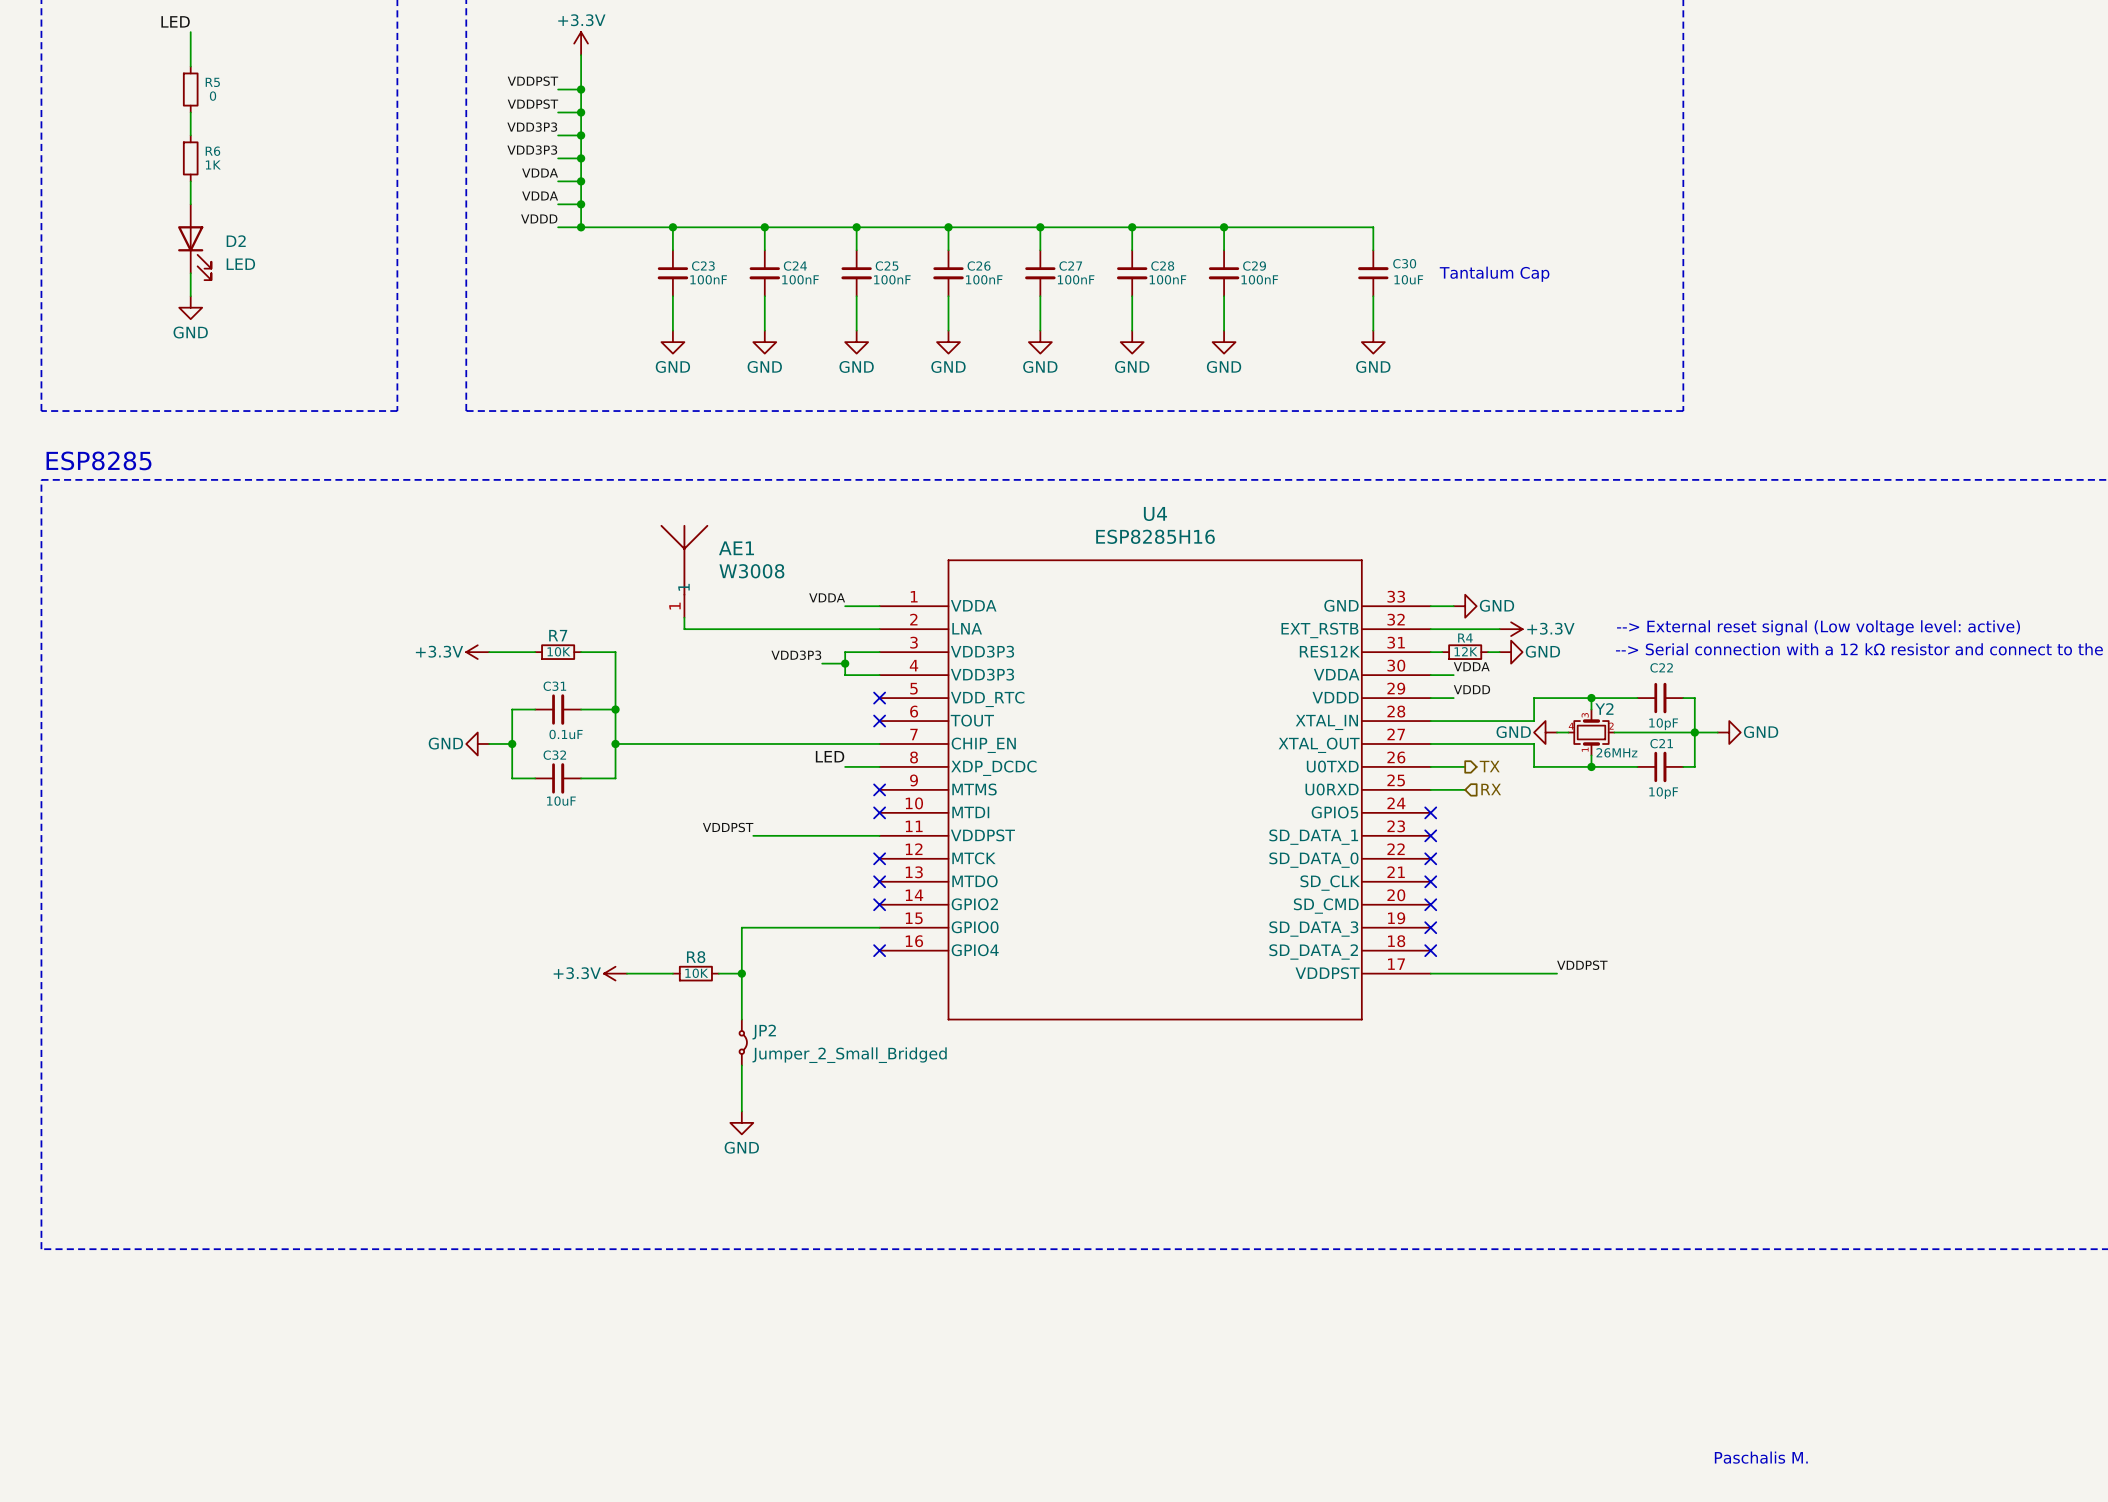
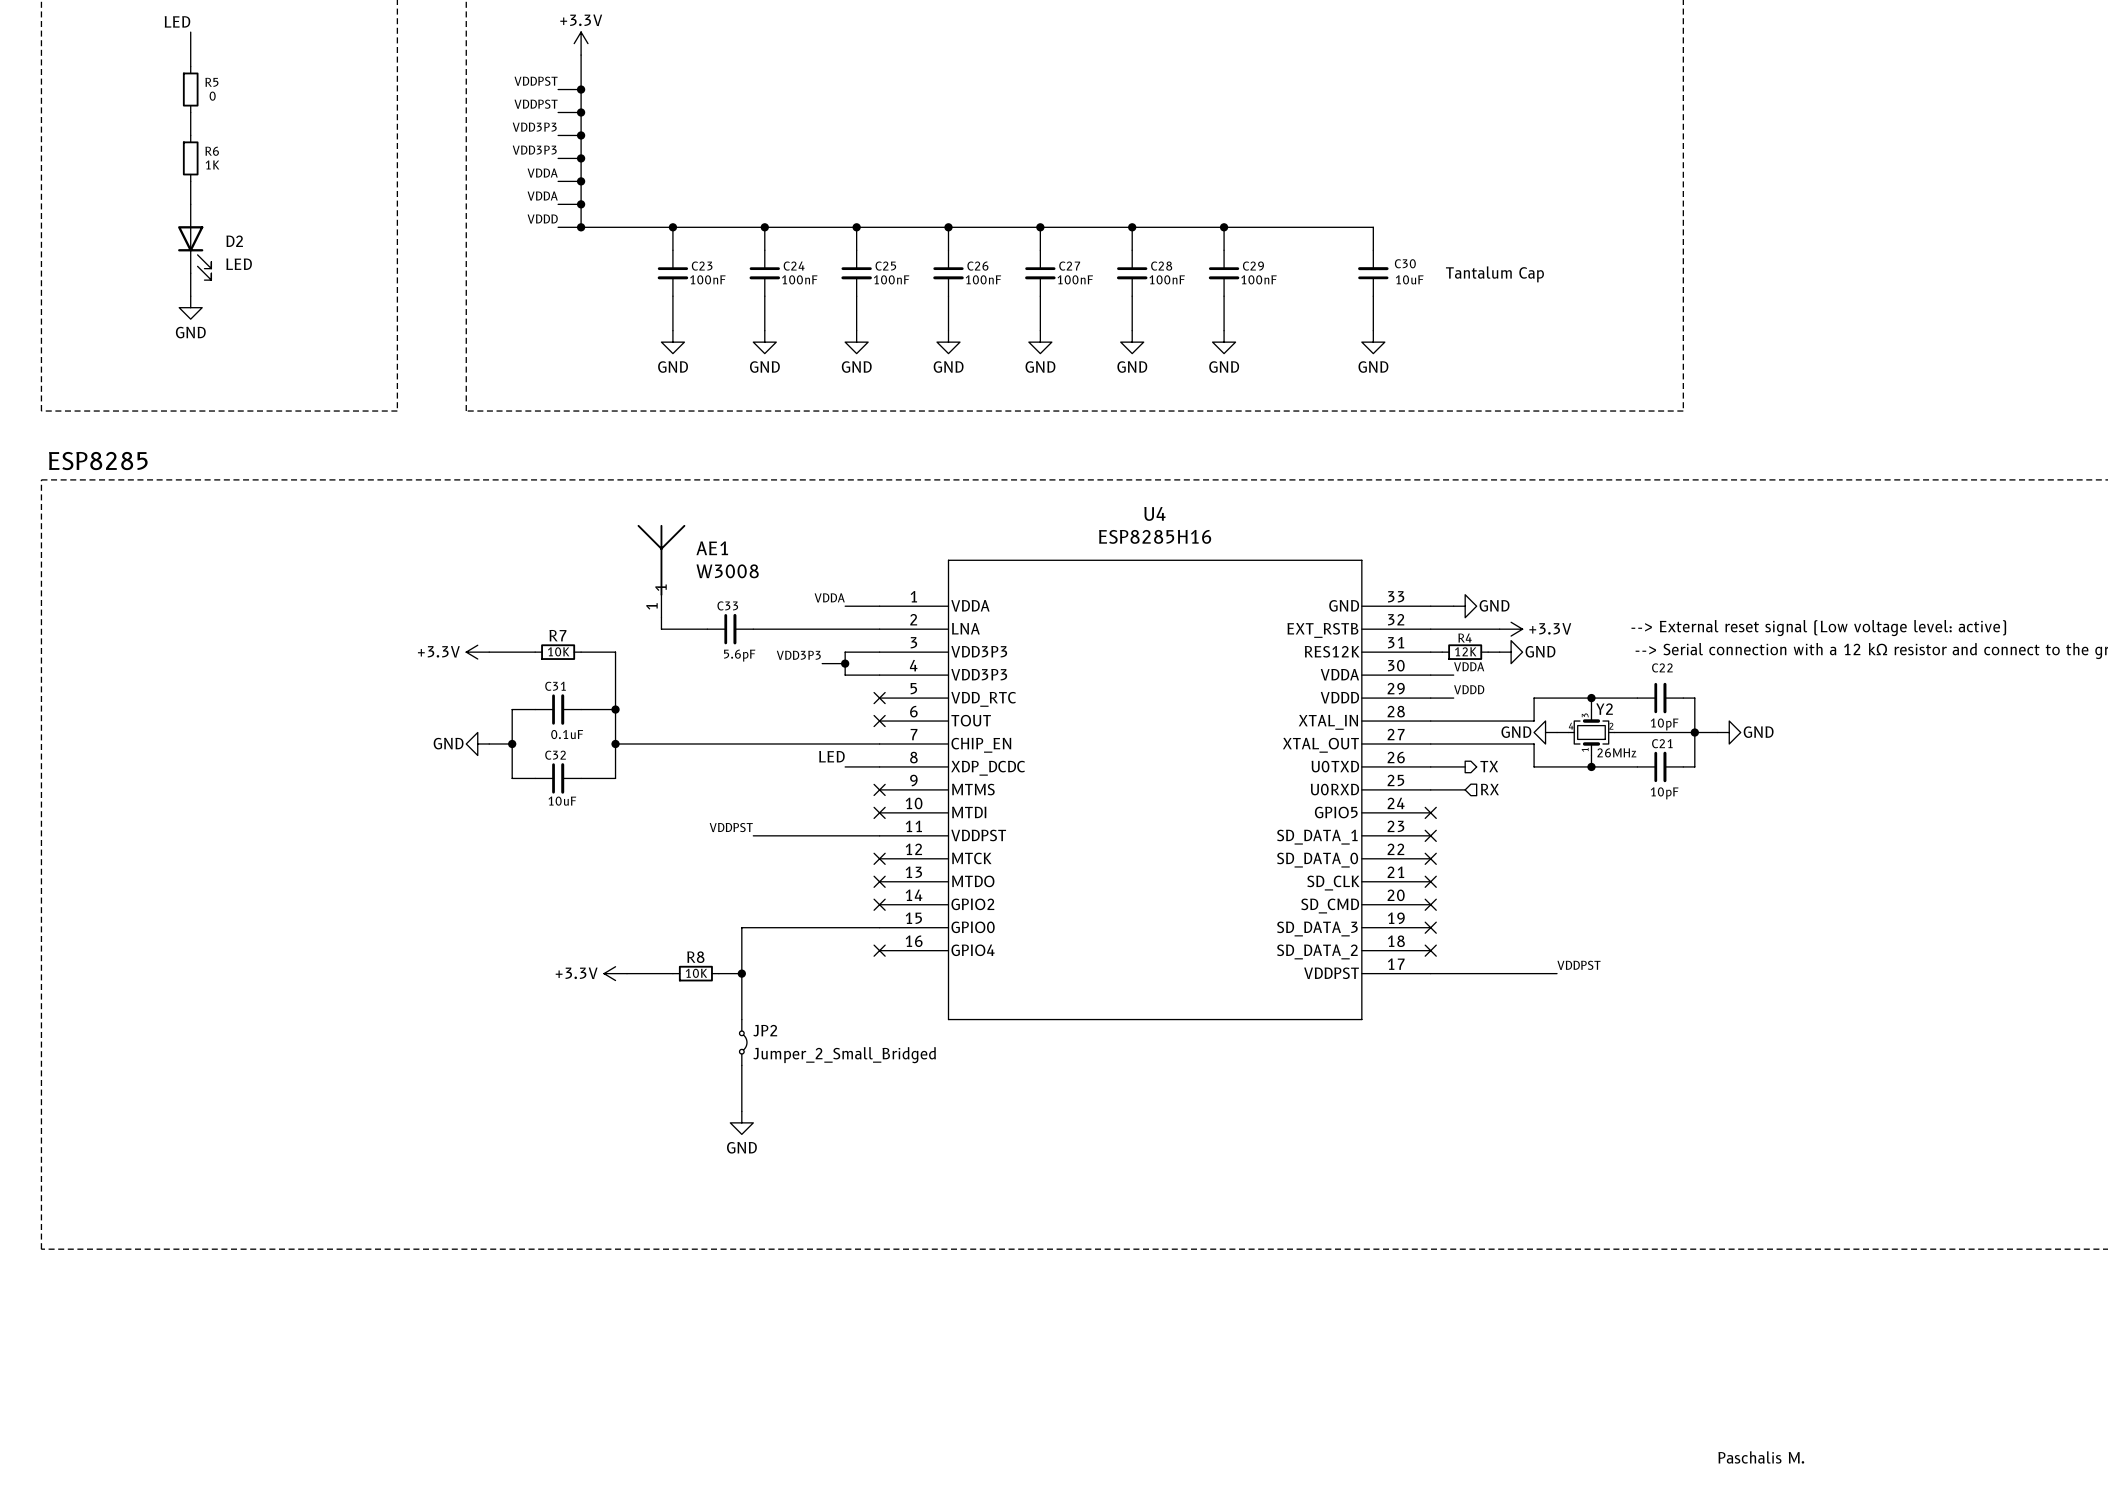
AE1 position: (684, 571) -> (661, 571)
wire: (684, 617) (684, 629) -> (661, 617) (661, 629) (684, 629)
C33: none -> 5.6pF (730, 629)

